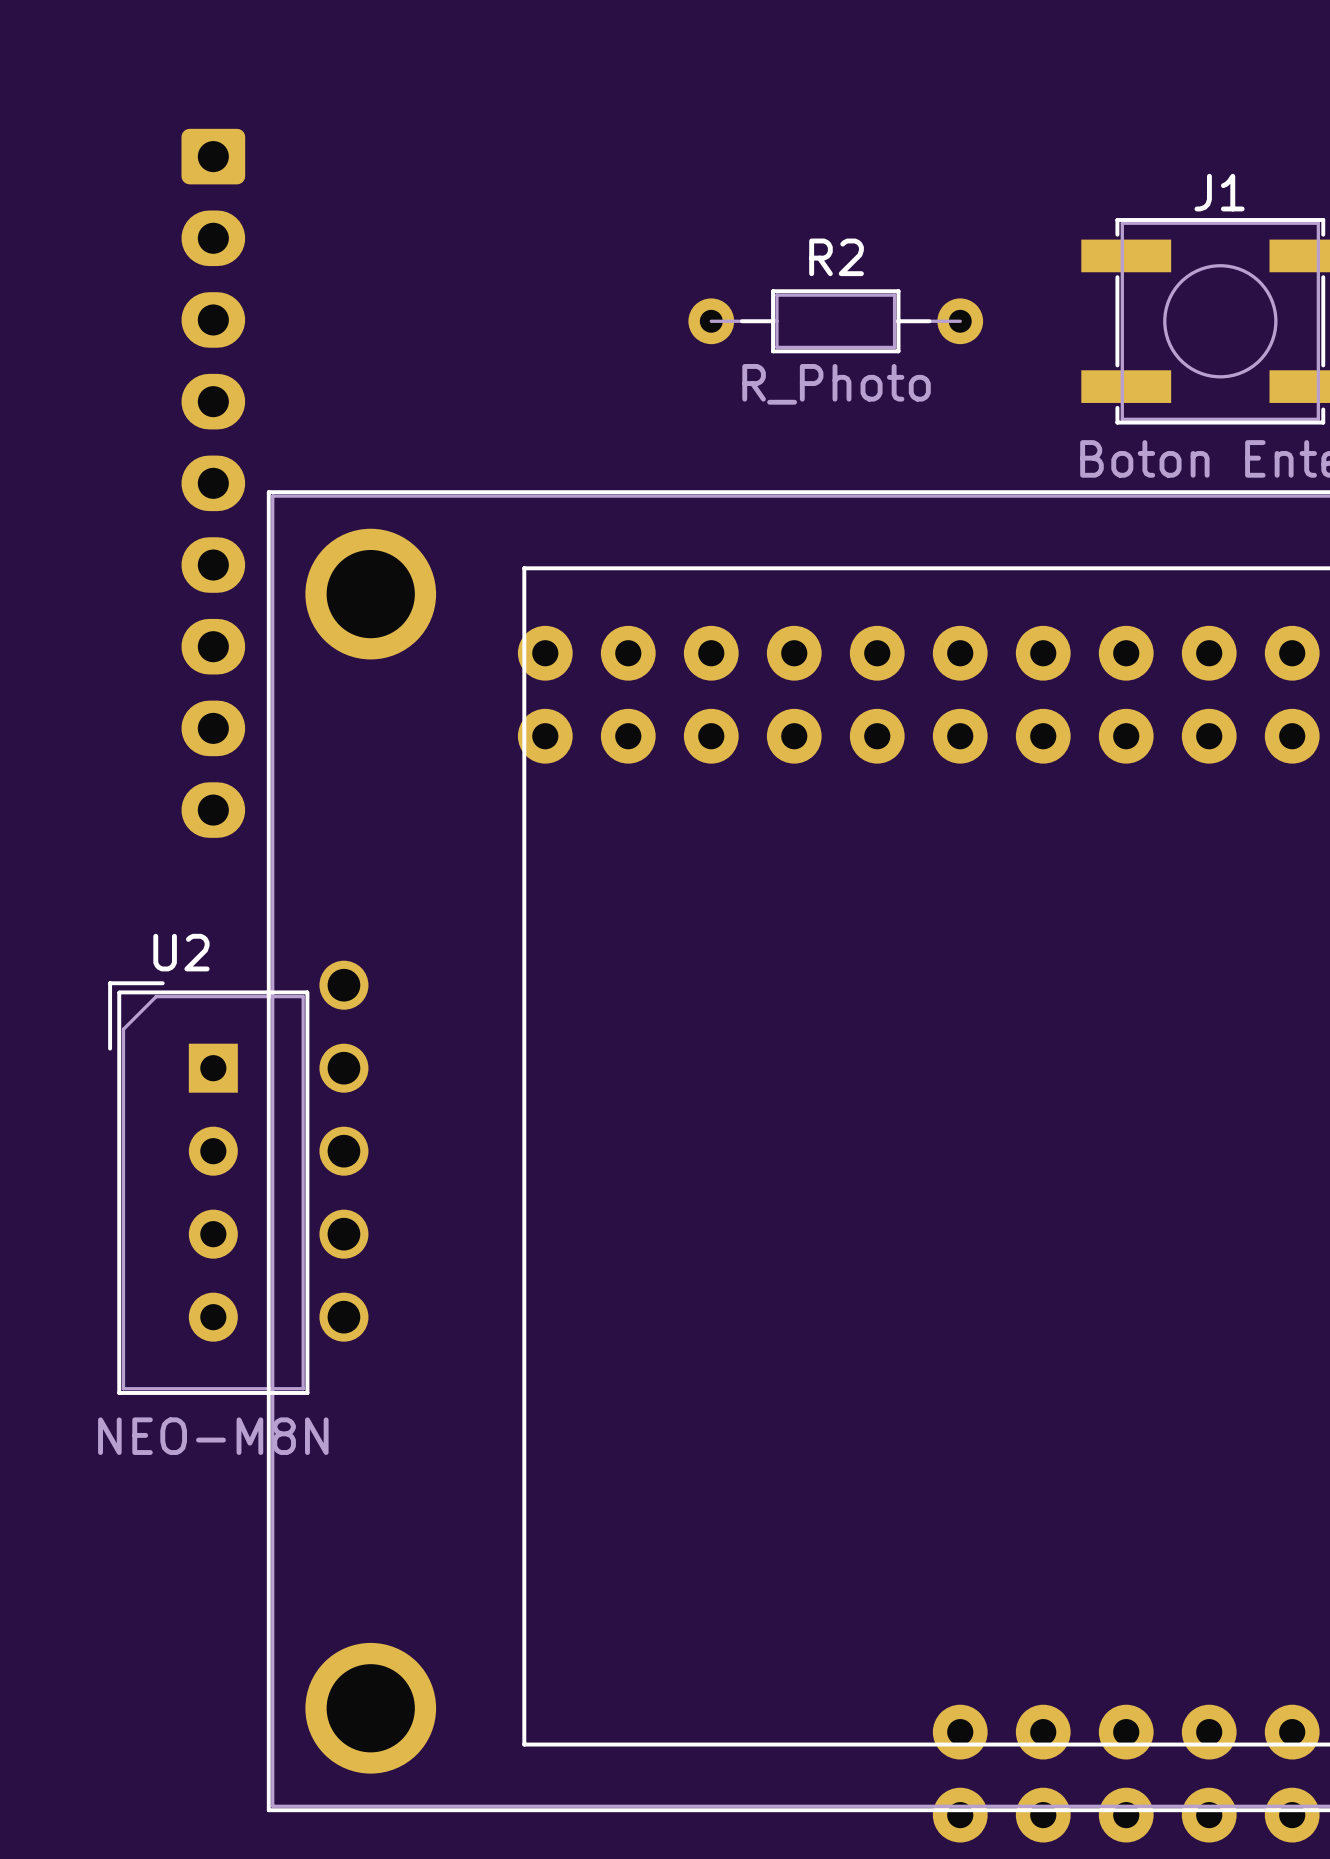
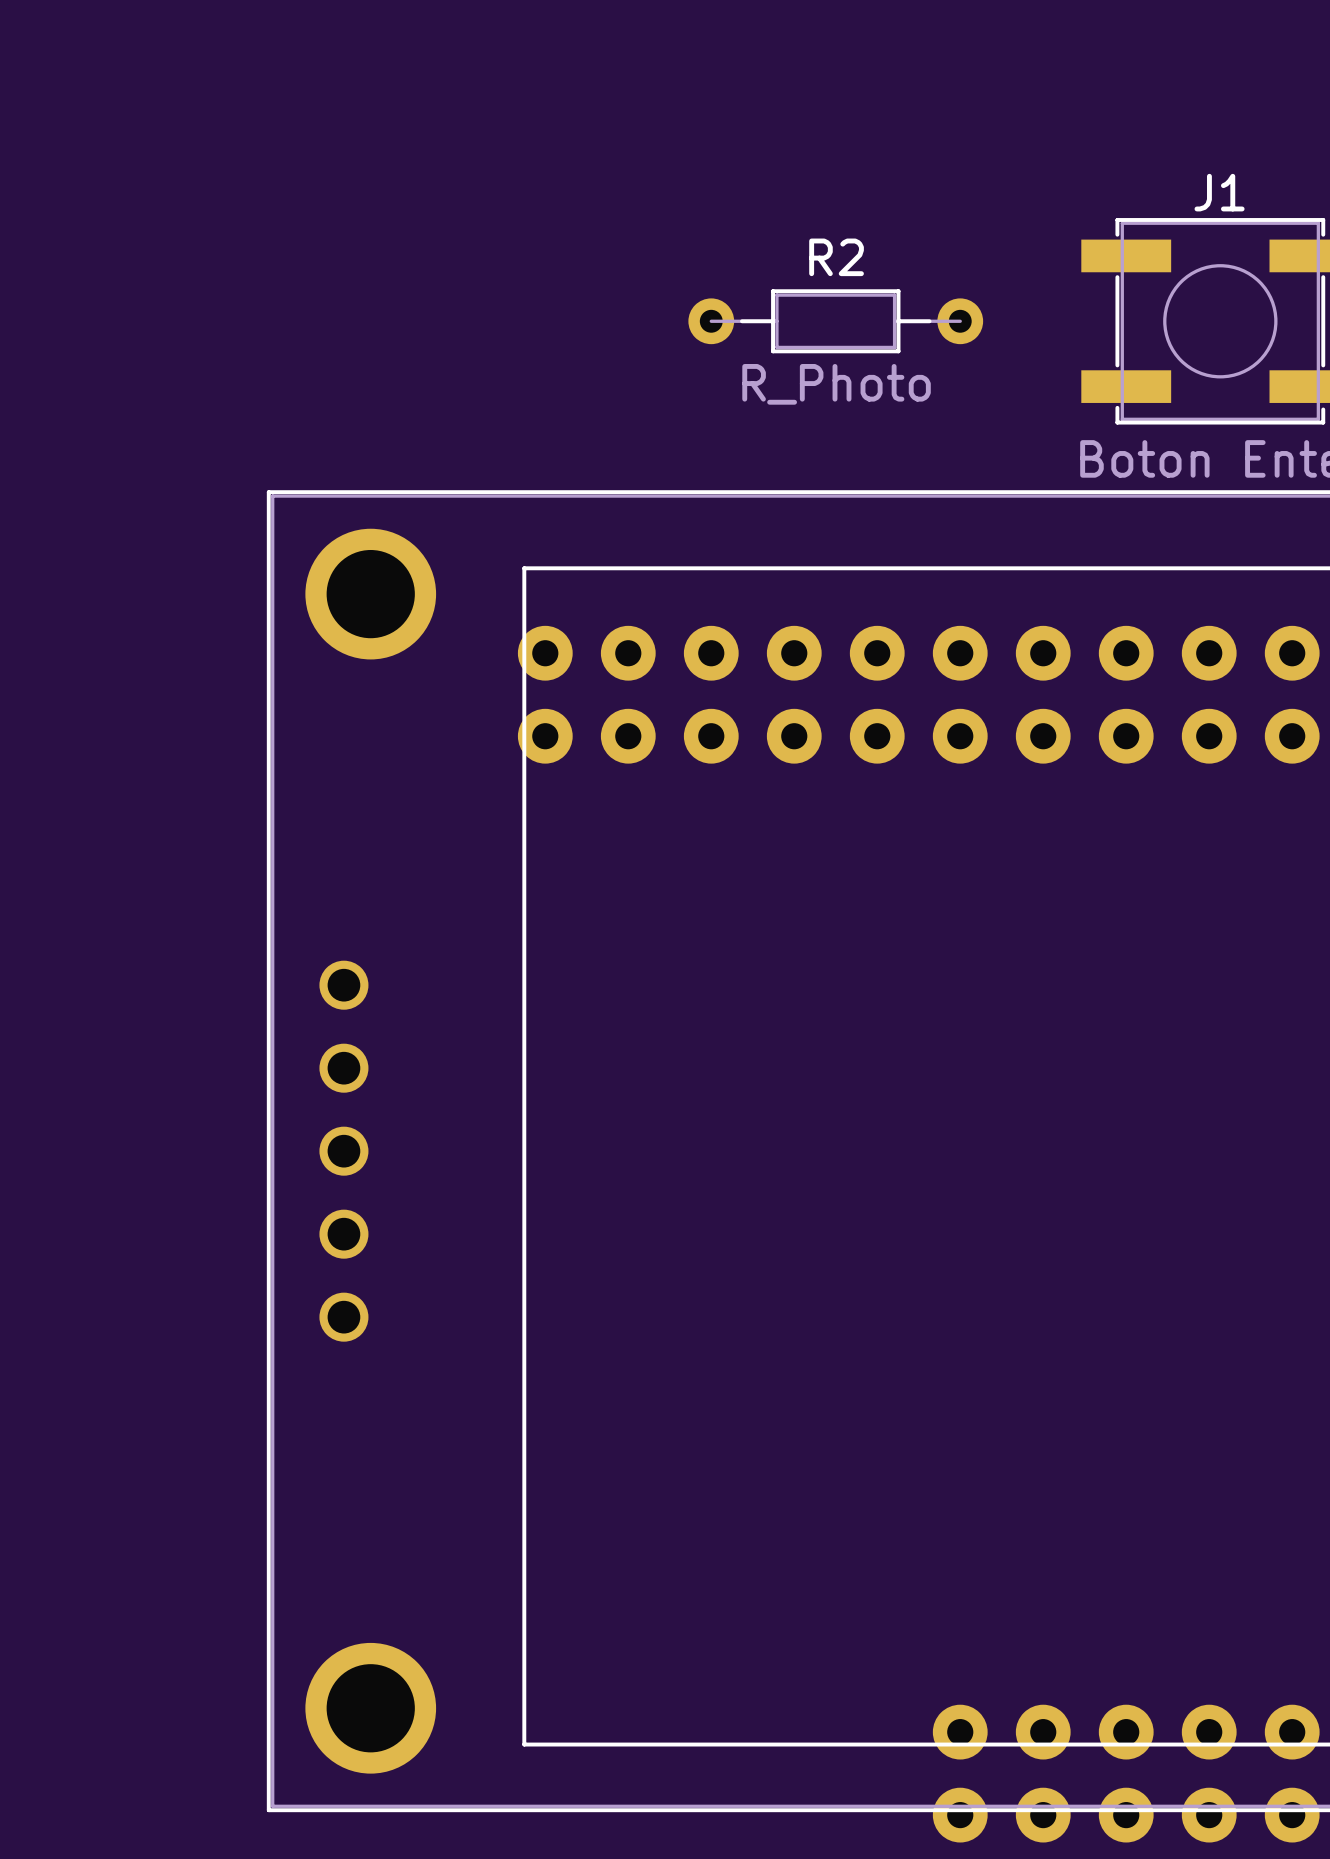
part: (213, 483) -> none
U2: NEO-M8N (208, 1188) -> none

